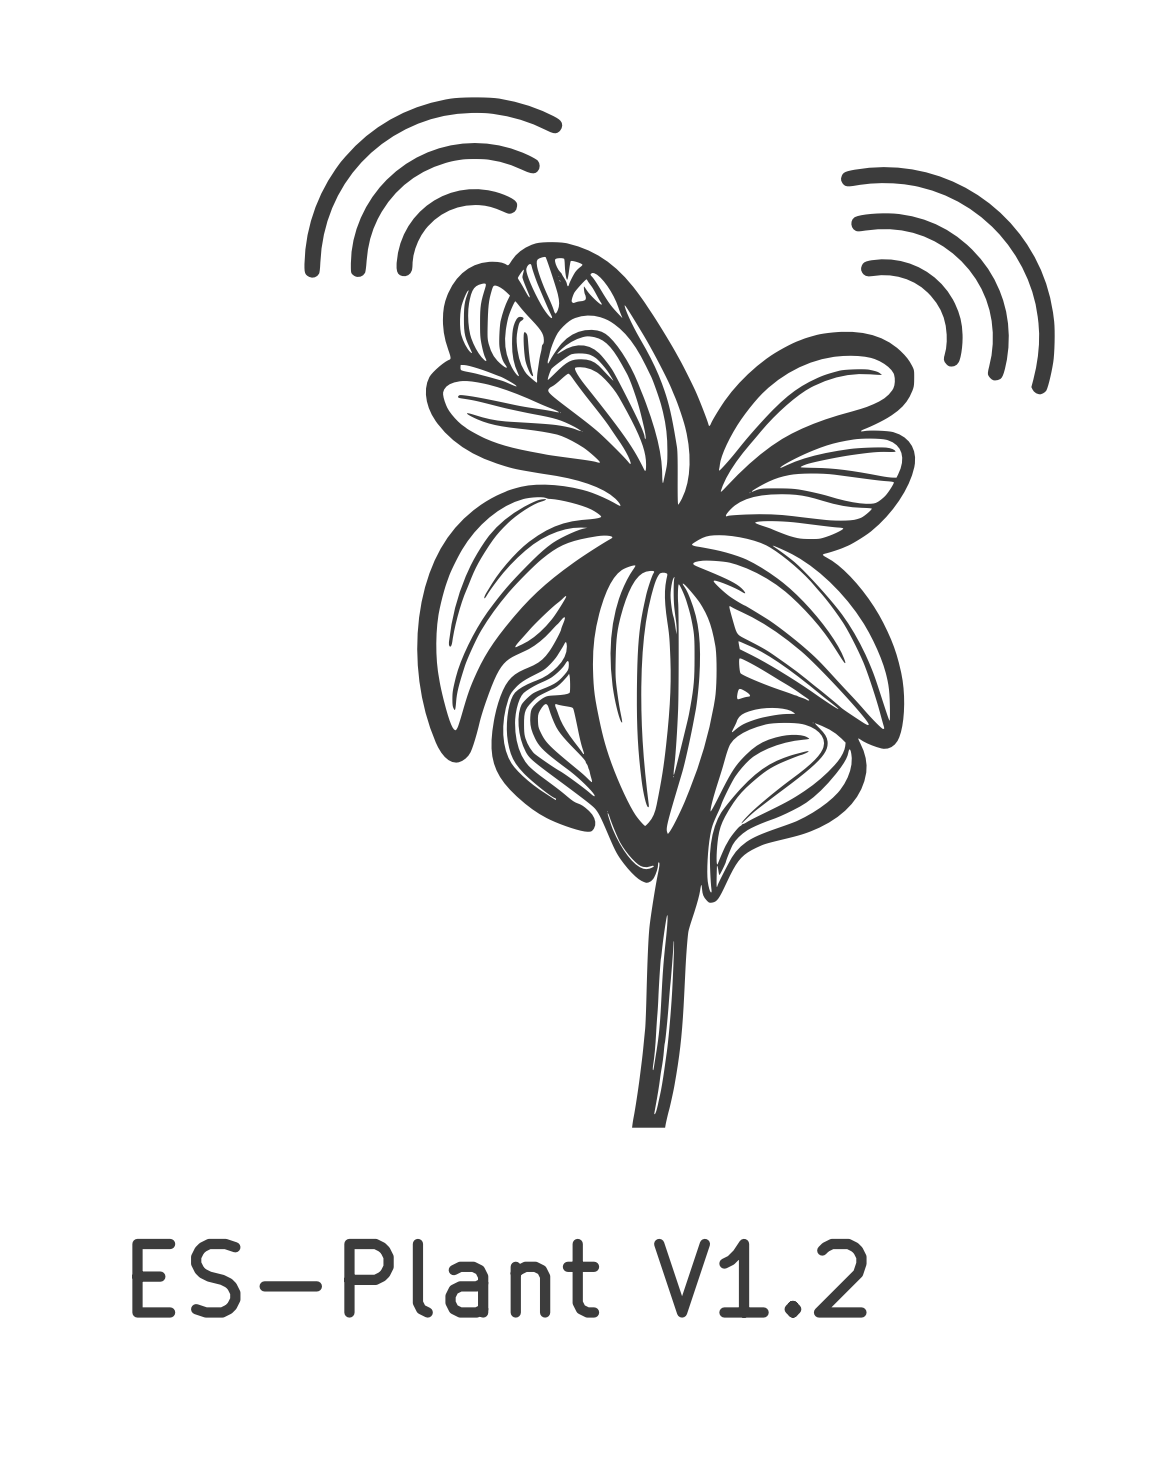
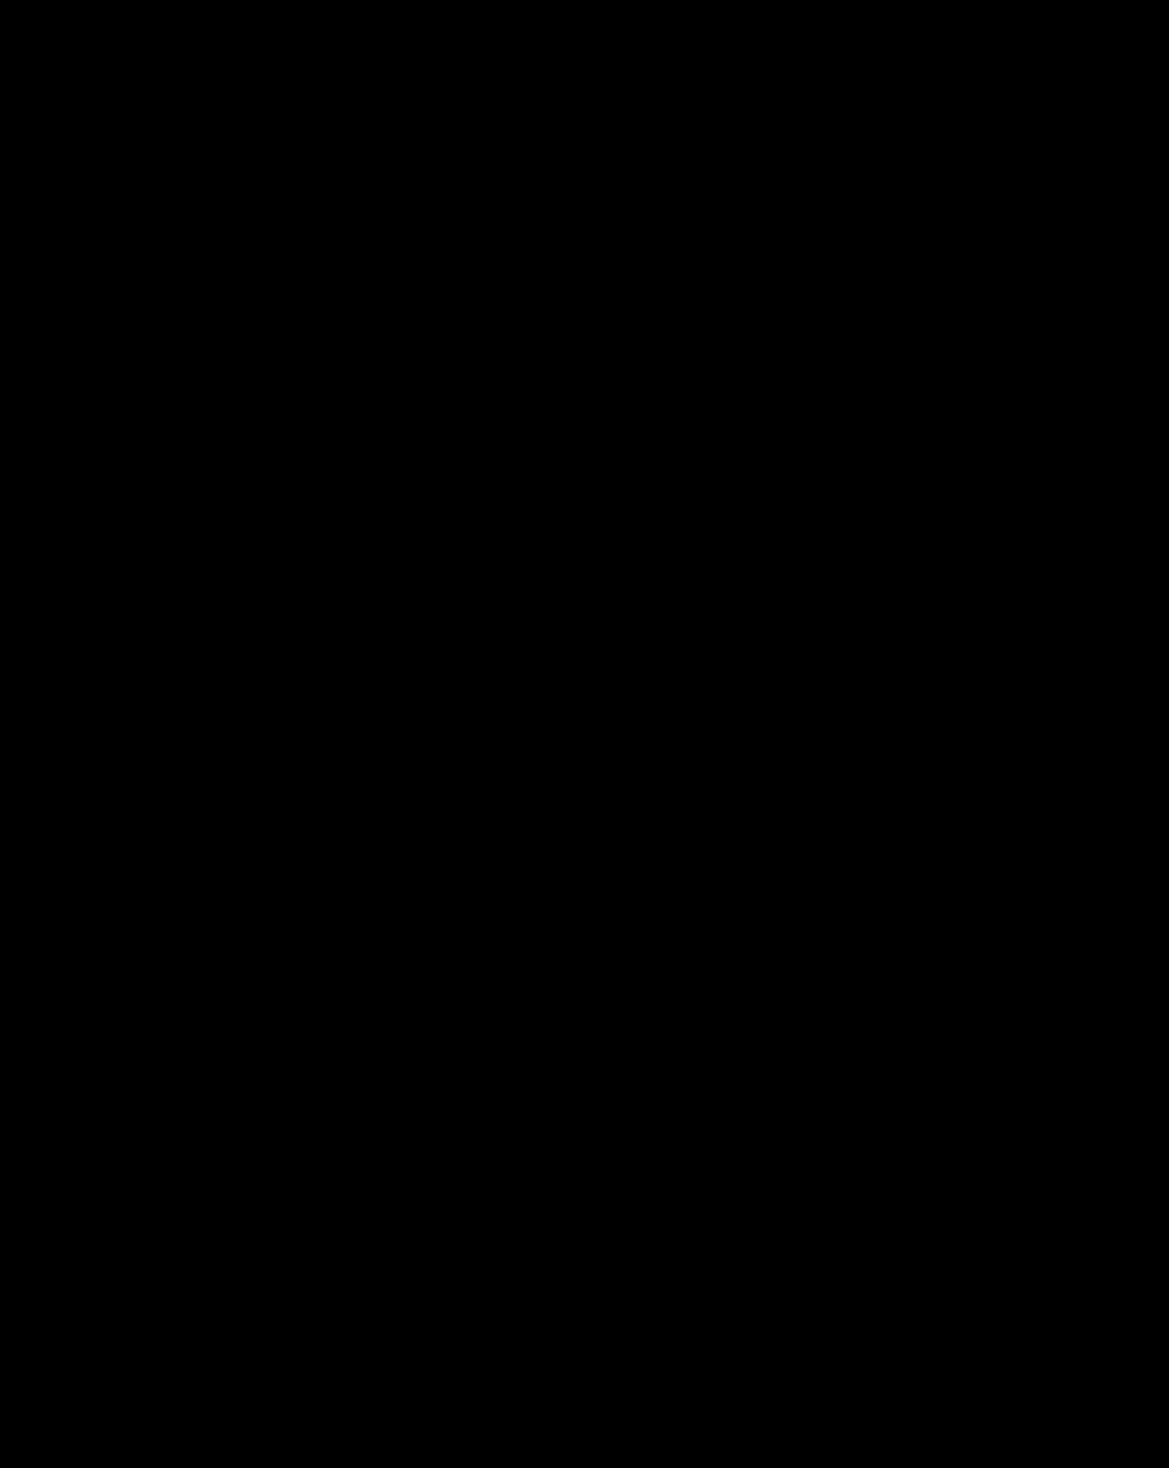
drawing: [304, 97, 1055, 1128] -> none
text: ES-Plant V1.2 (499, 1278) -> none

